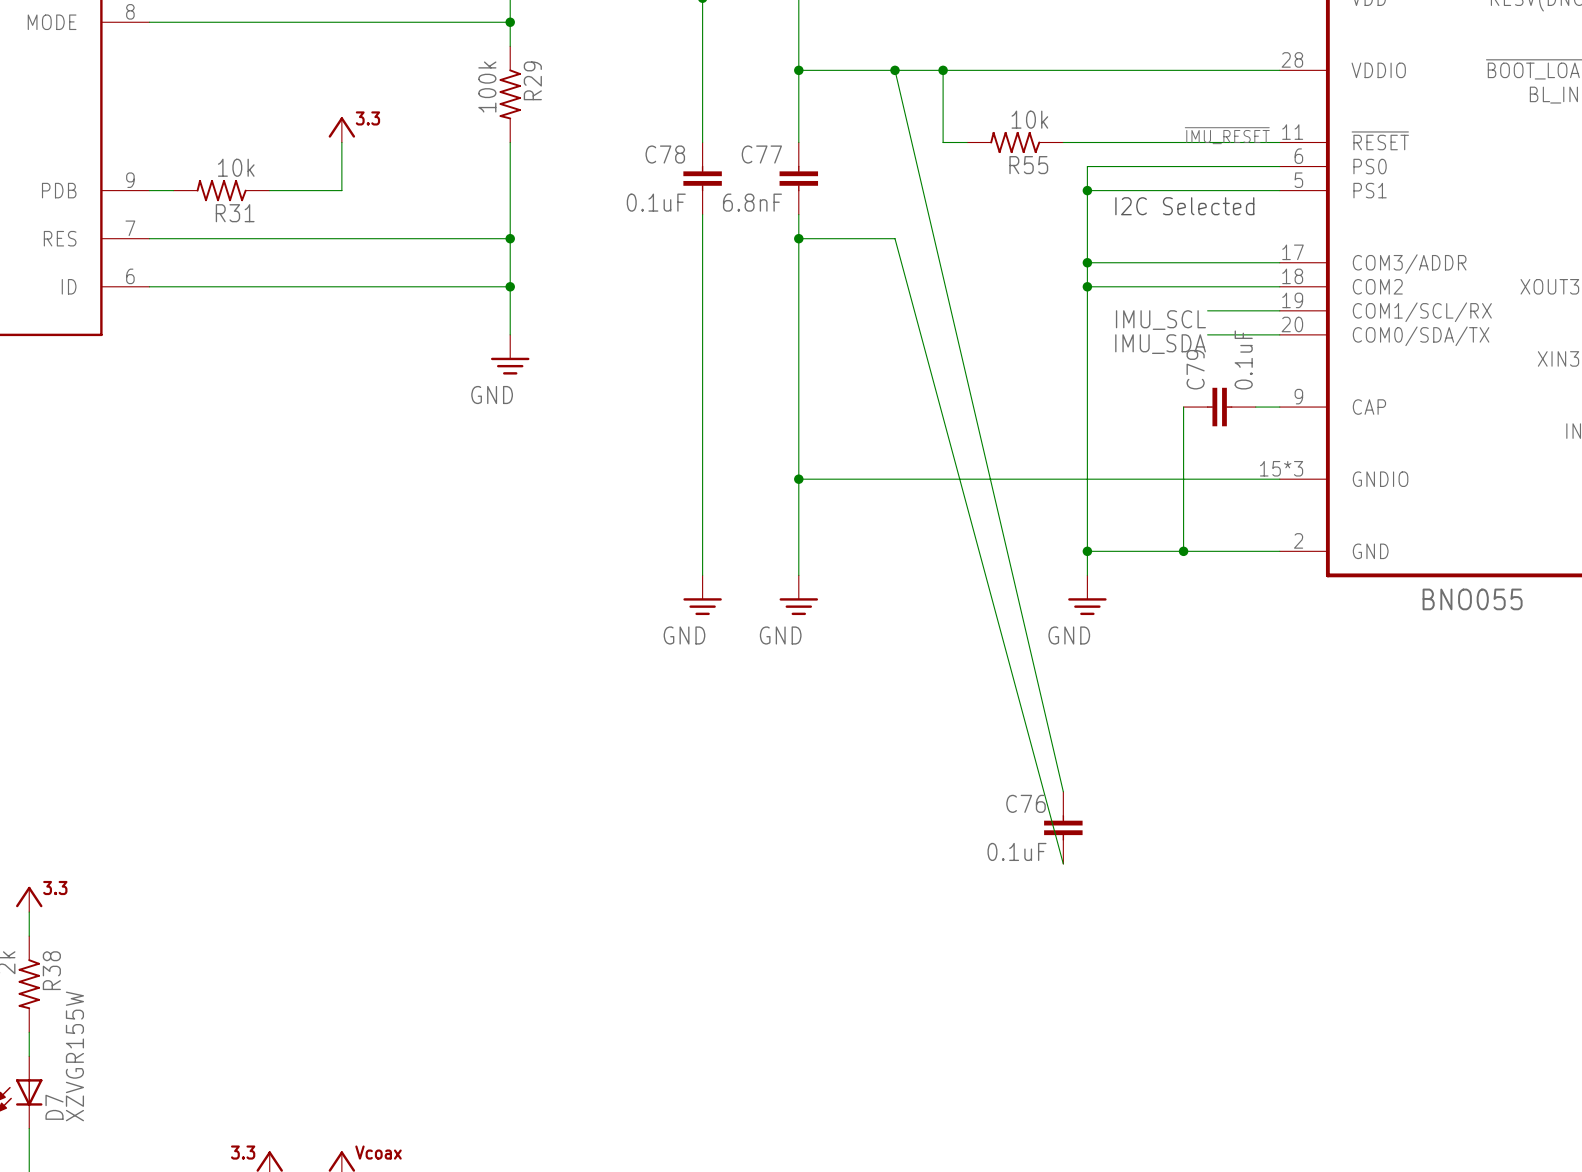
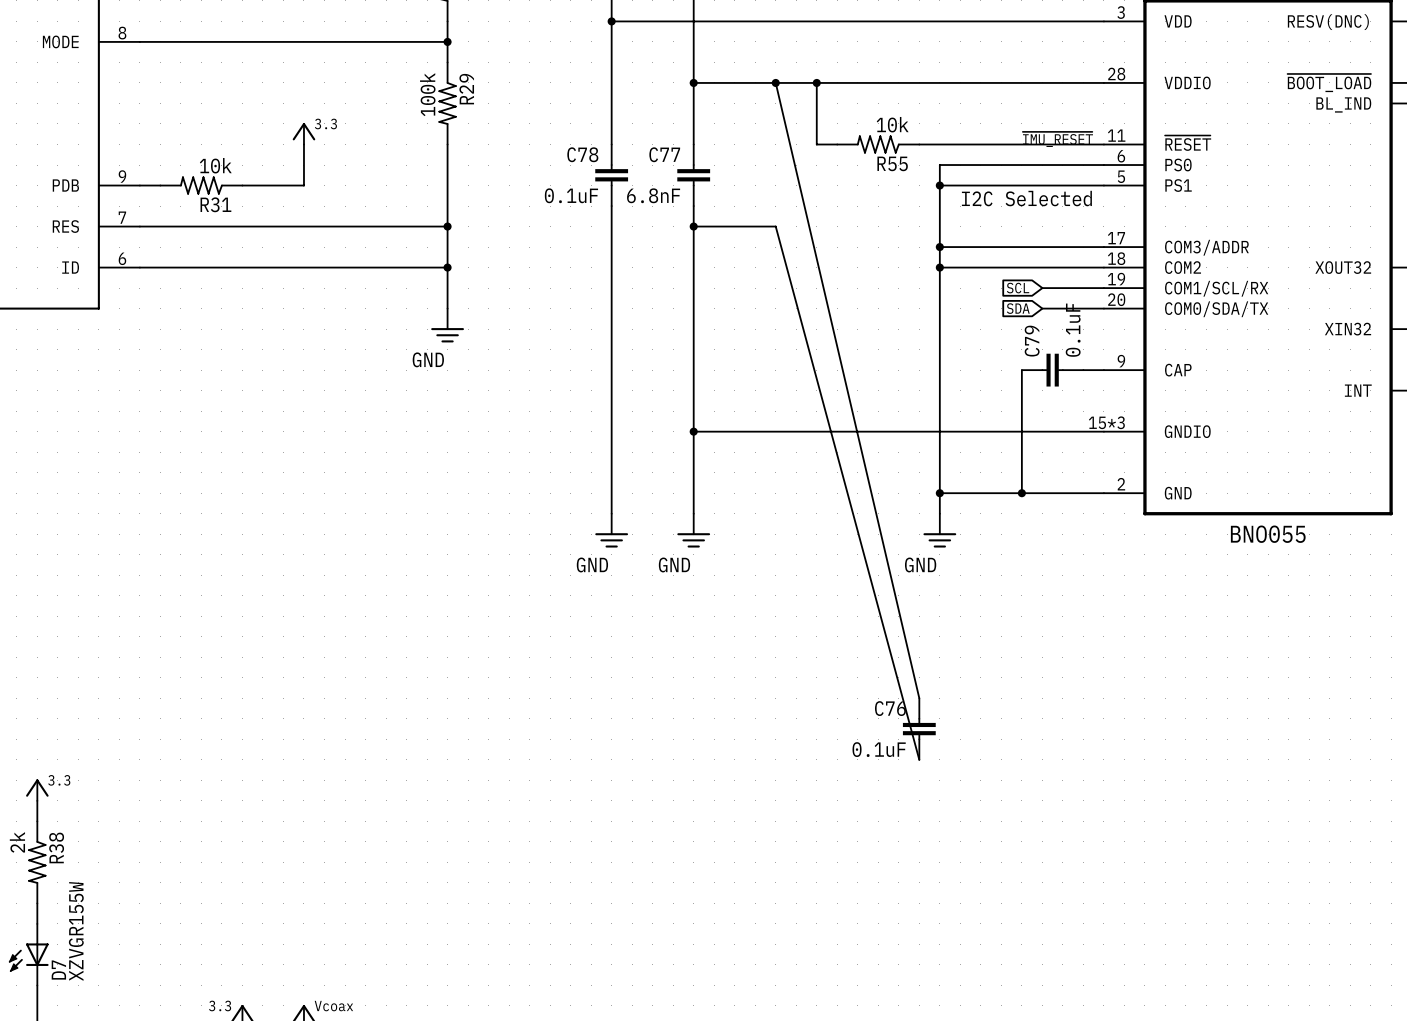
global label: none -> SCL (1018, 288)
label: IMU_SCL (1160, 320) -> none
global label: none -> SDA (1018, 308)
label: IMU_SDA (1160, 344) -> none

